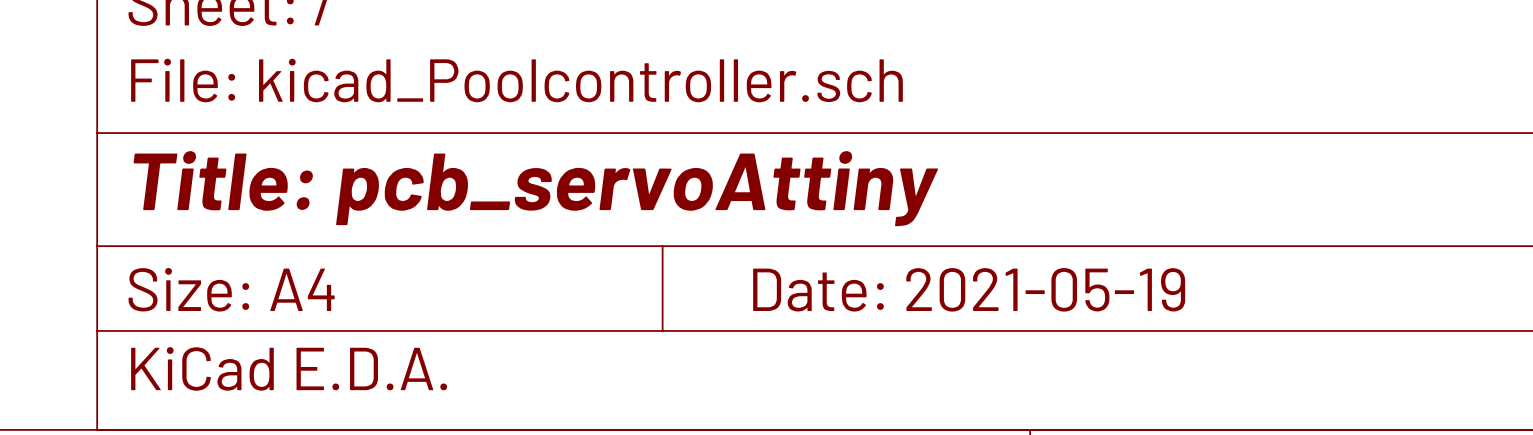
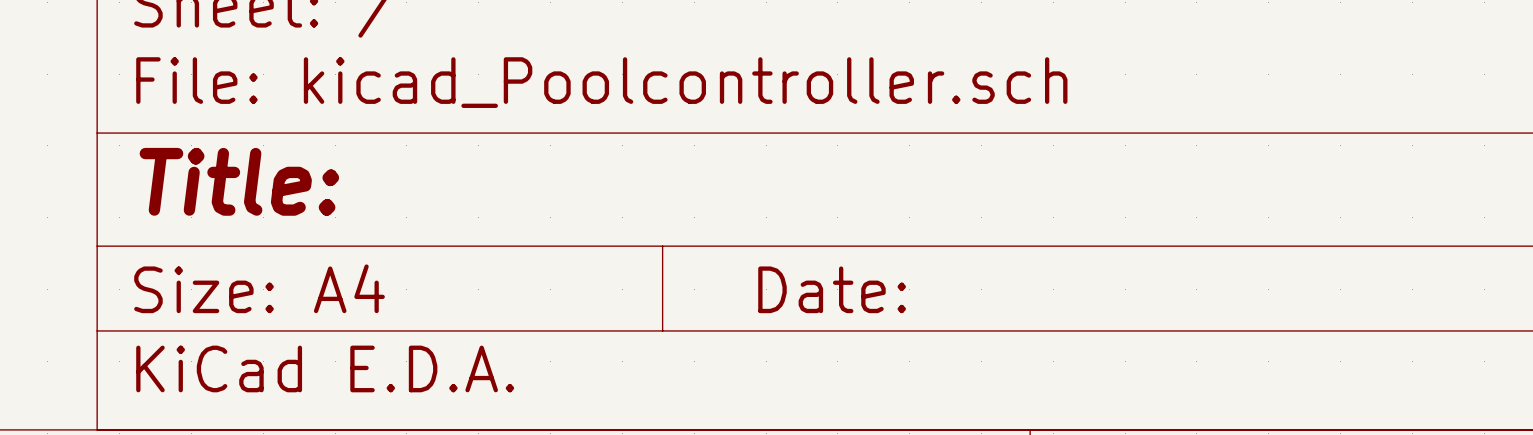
title block: Title: pcb_servoAttiny (535, 188) -> Title: (239, 181)
title block: Date: 2021-05-19 (969, 289) -> Date: (832, 289)

